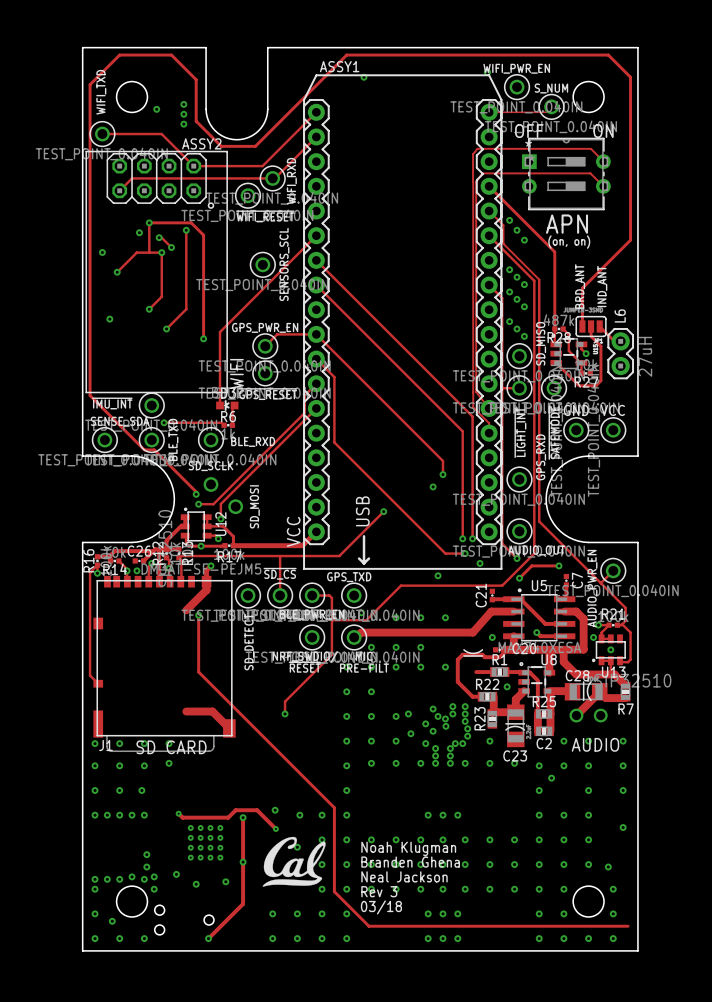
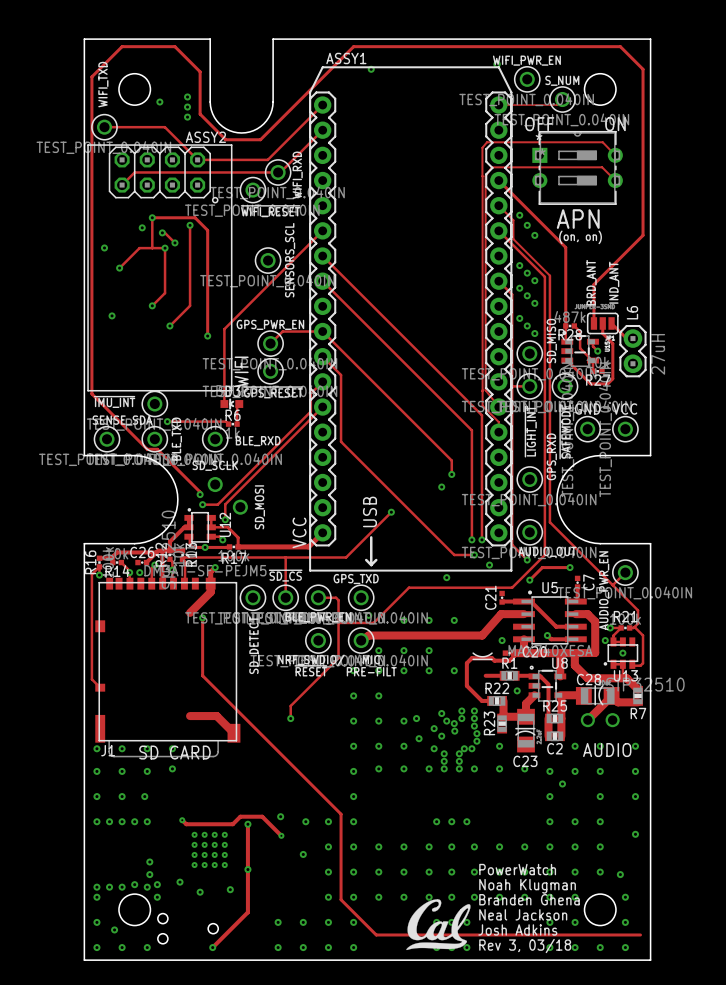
text position: Noah Klugman (408, 848) -> Noah Klugman (527, 886)
drawing position: (294, 861) -> (438, 924)
text position: Branden Ghena (410, 862) -> Branden Ghena (529, 899)
text: none -> PowerWatch (517, 869)
text position: Neal Jackson (404, 876) -> Neal Jackson (523, 914)
text: Rev 3 (379, 891) -> none
text: 03/18 (381, 907) -> none
text: none -> Josh Adkins (517, 929)
text: none -> Rev 3, 03/18 (525, 946)

